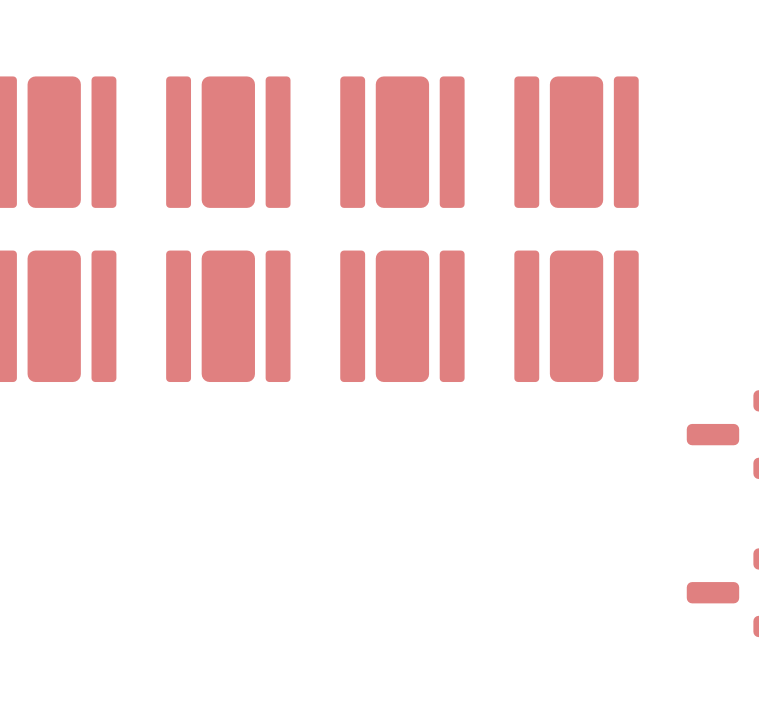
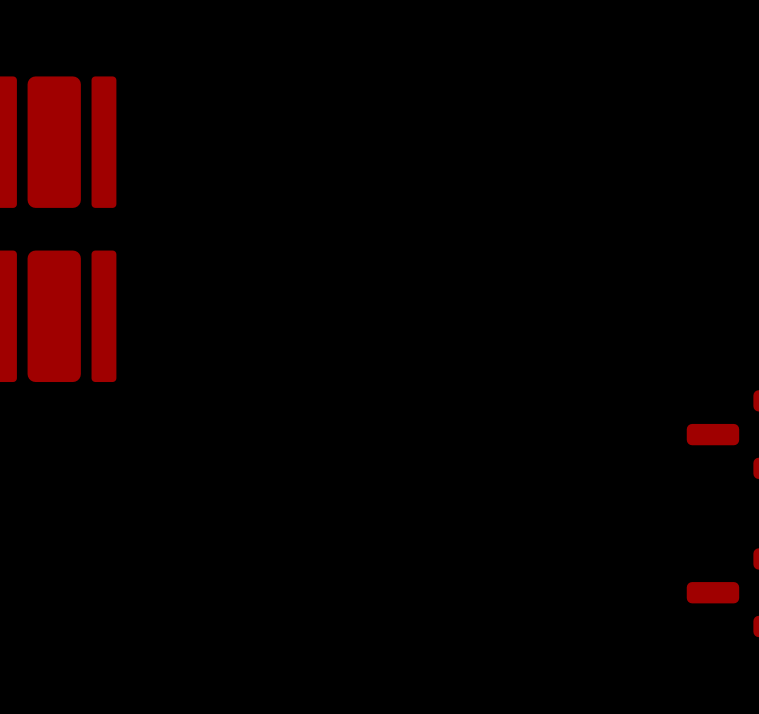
part: (228, 142) -> none
part: (402, 142) -> none
part: (576, 142) -> none
part: (228, 316) -> none
part: (402, 316) -> none
part: (576, 316) -> none

